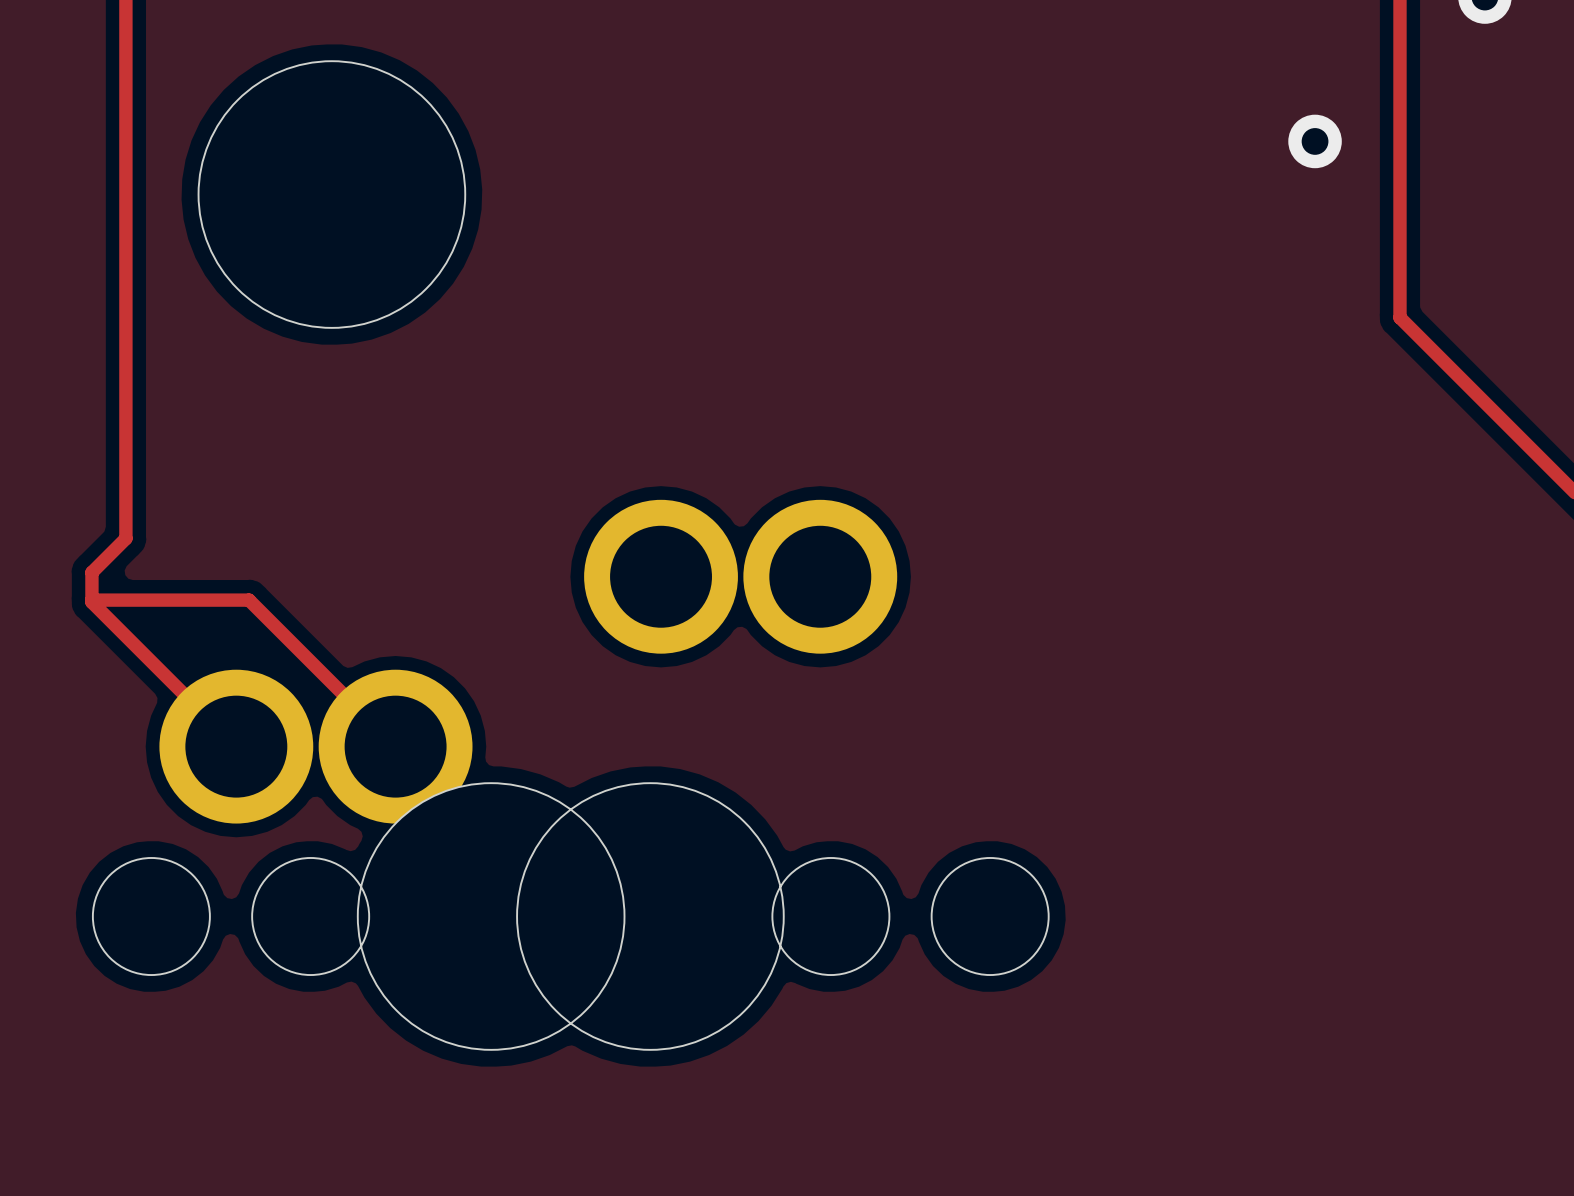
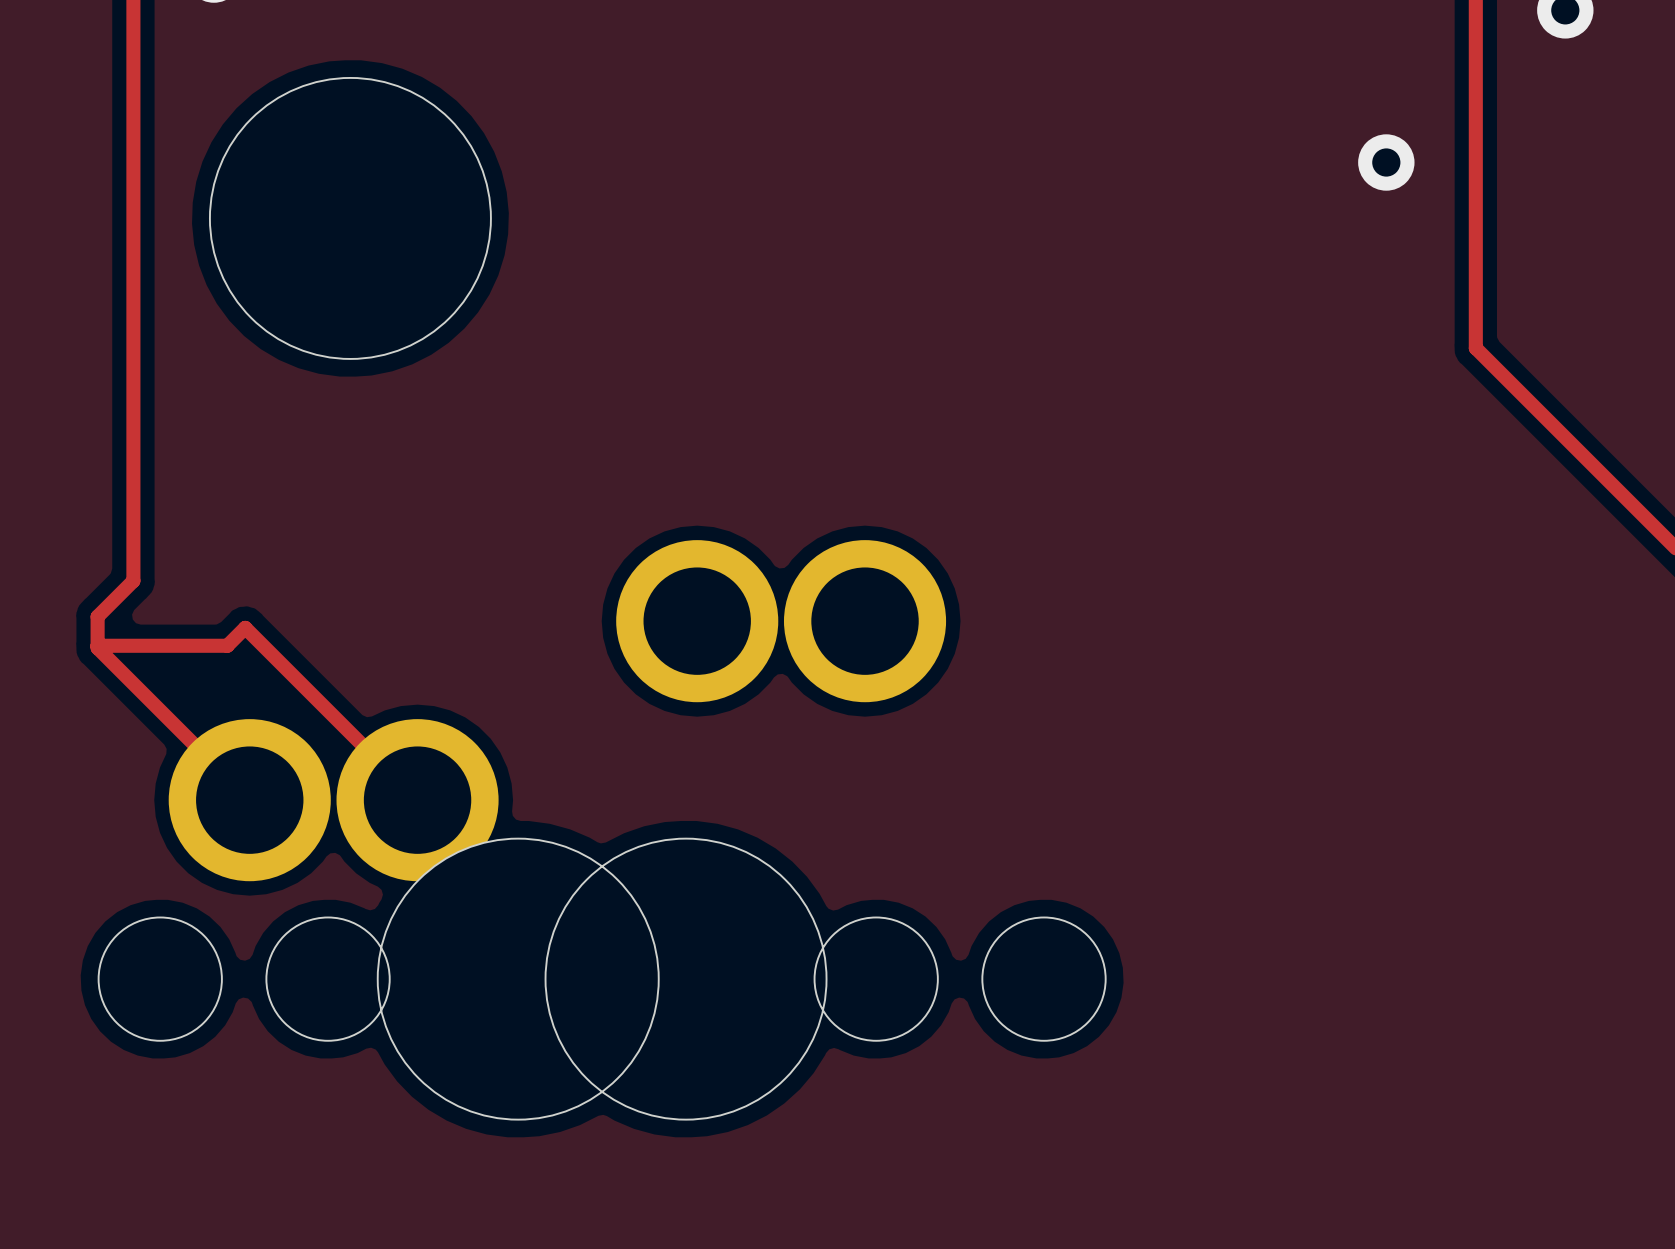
track: (215, 600) (249, 600) -> (227, 645) (245, 627) (263, 645)

